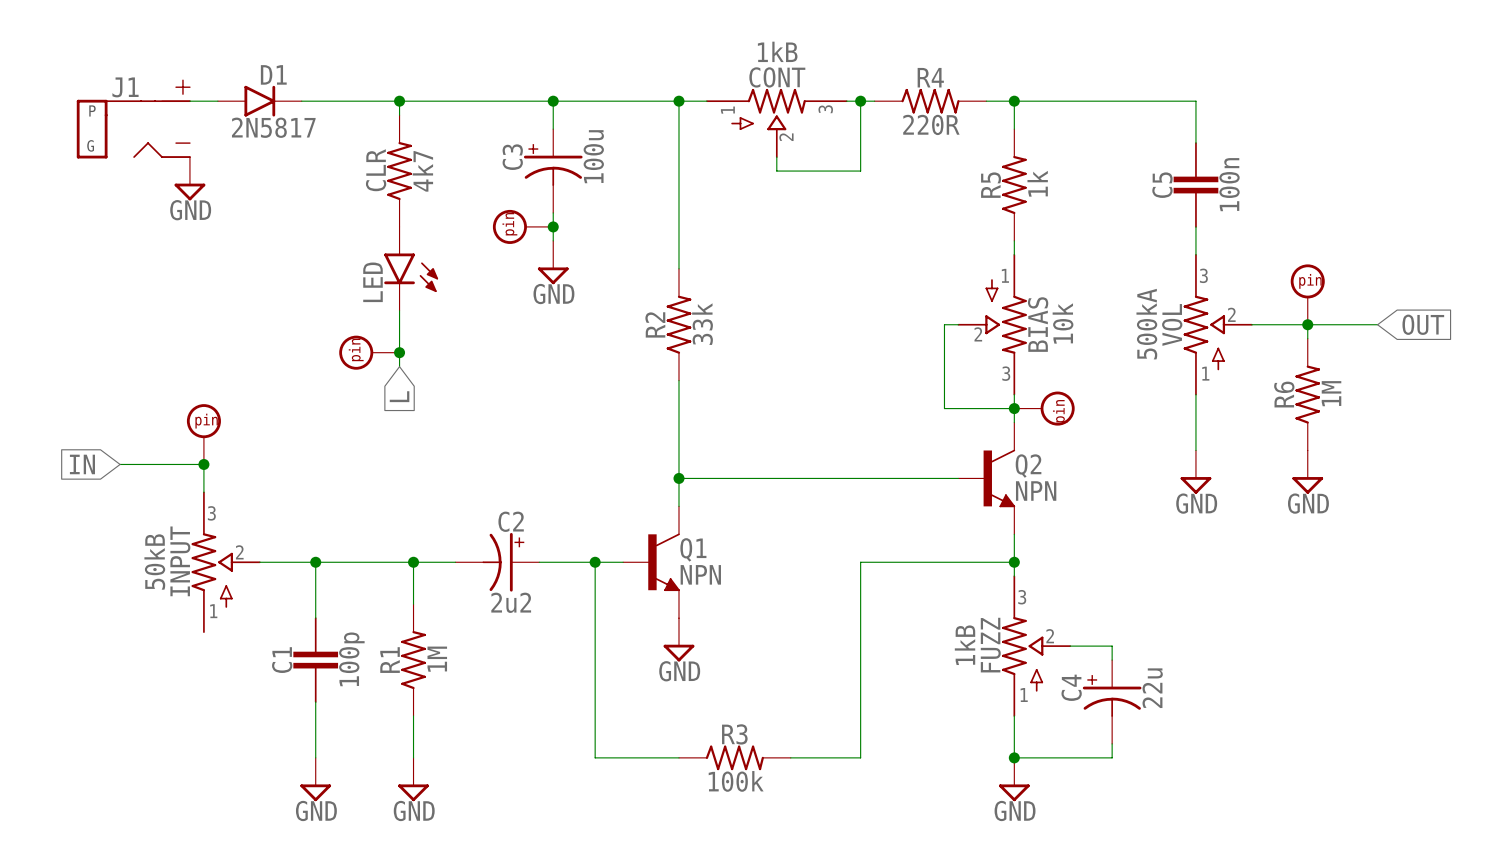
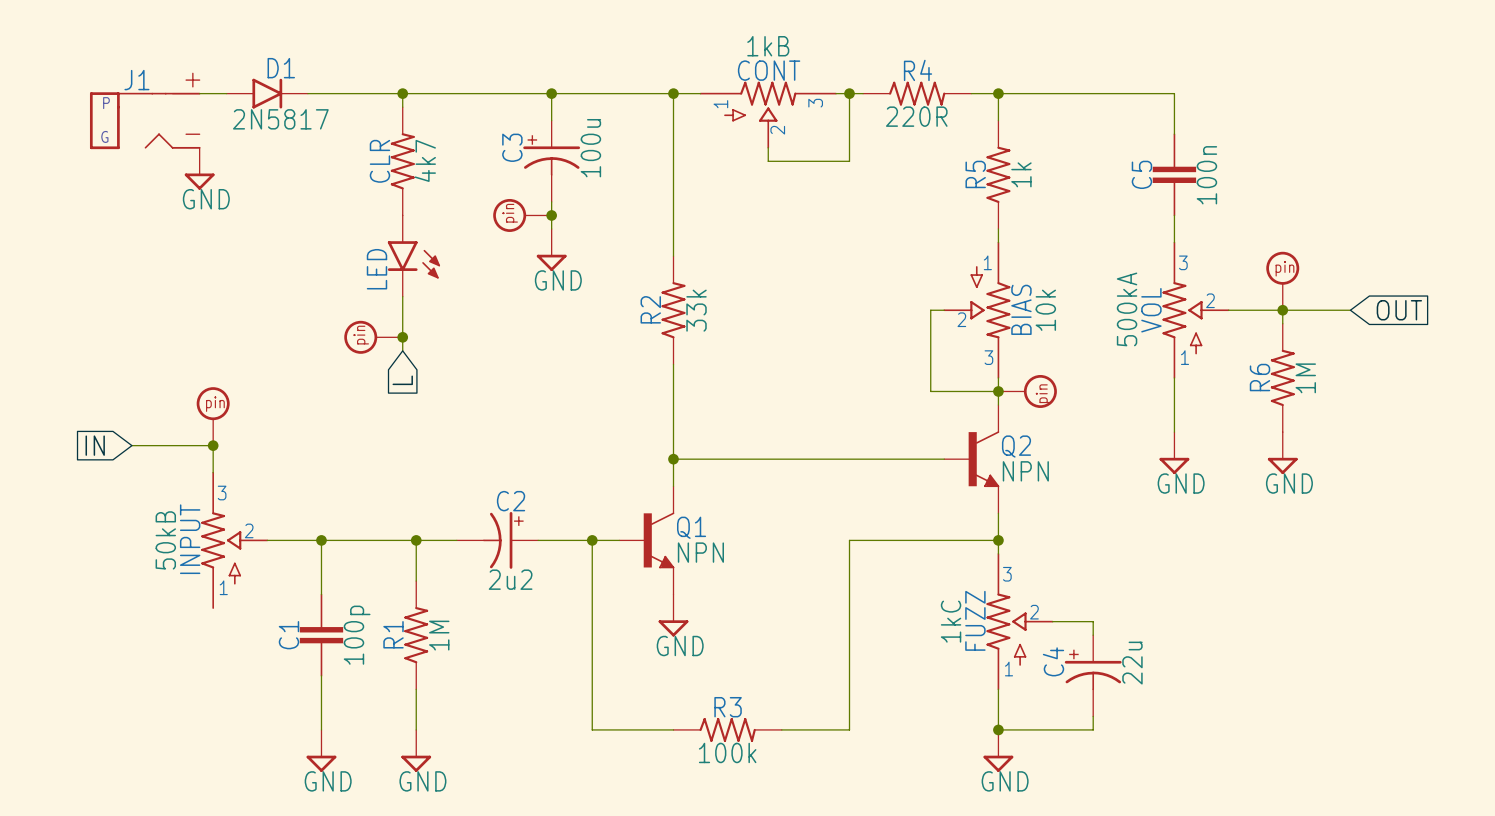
FUZZ value: 1kB (965, 645) -> 1kC (951, 621)

